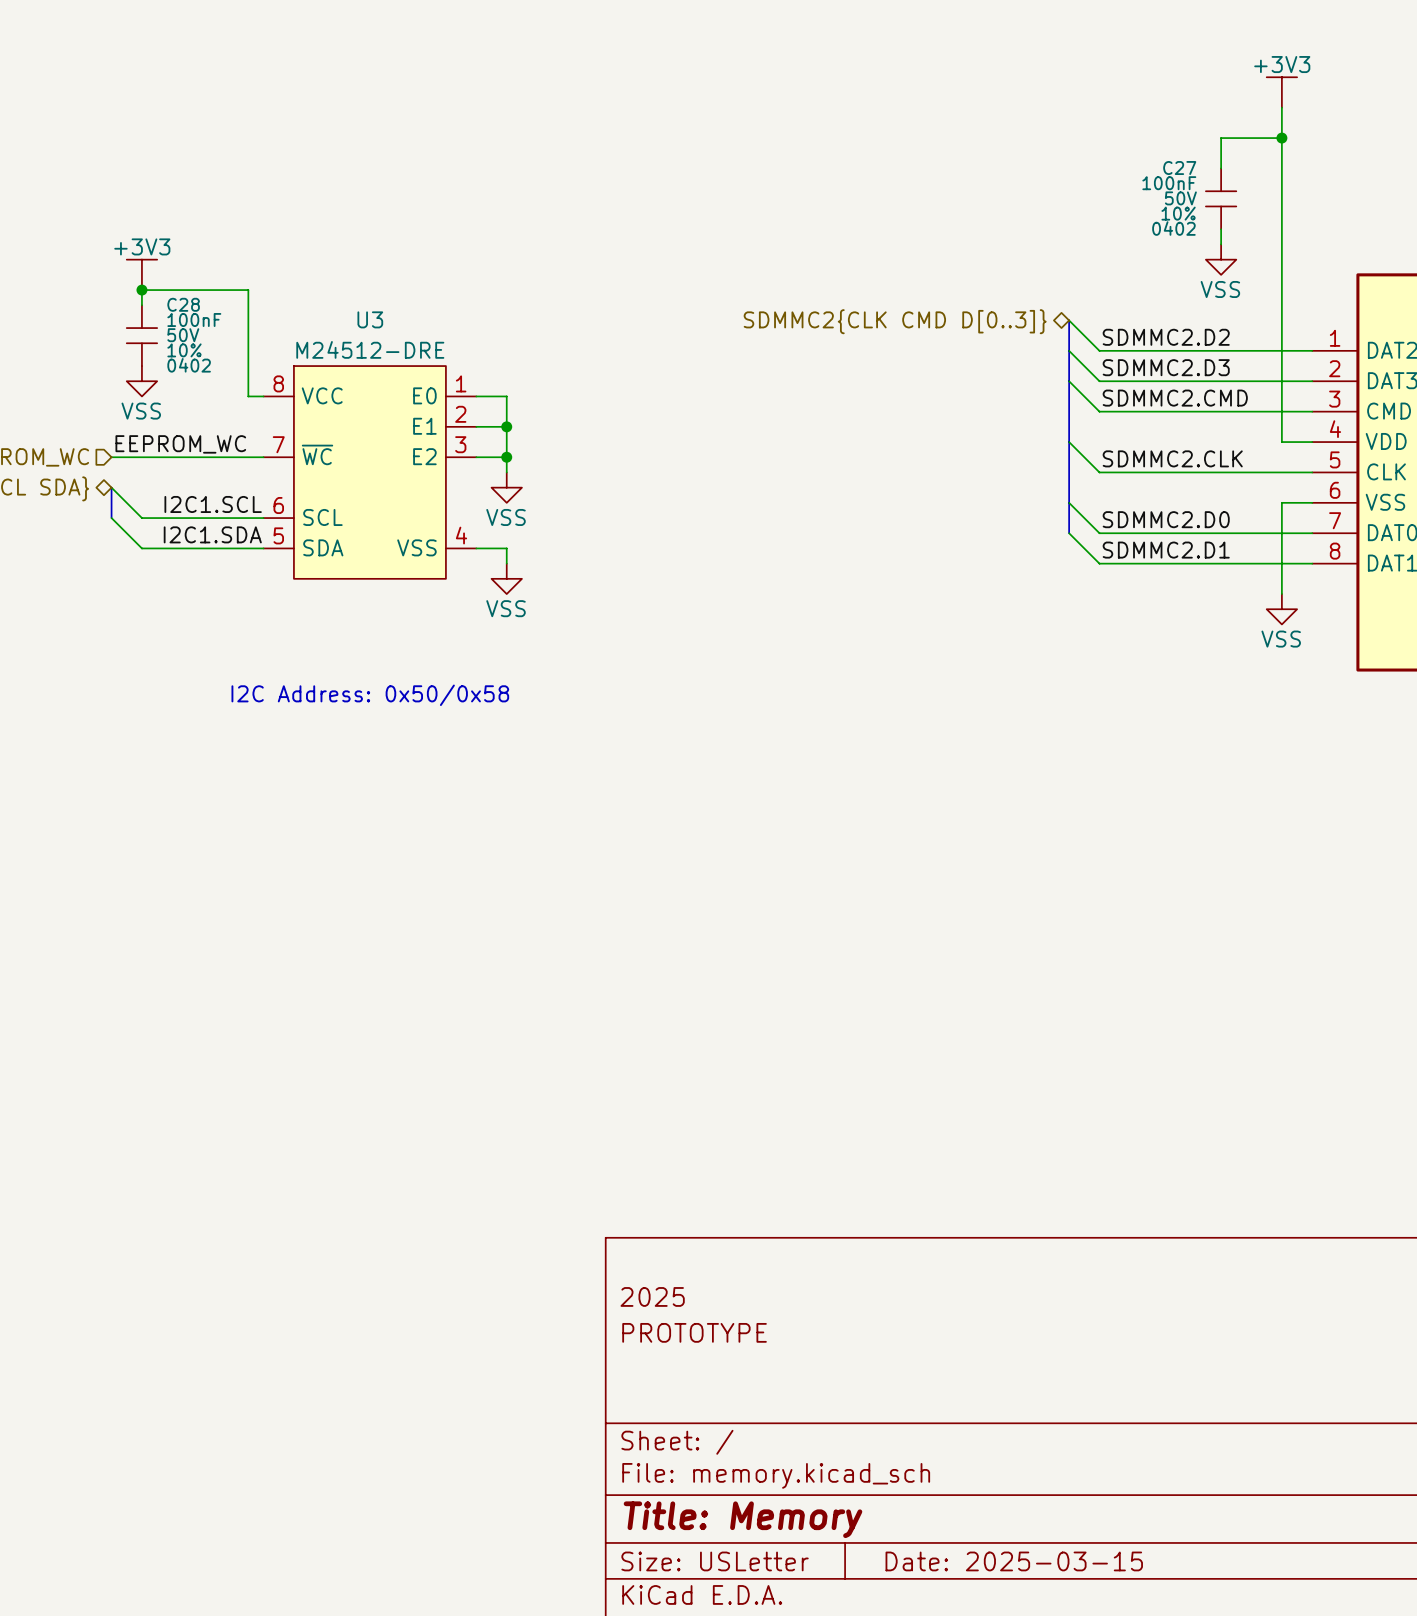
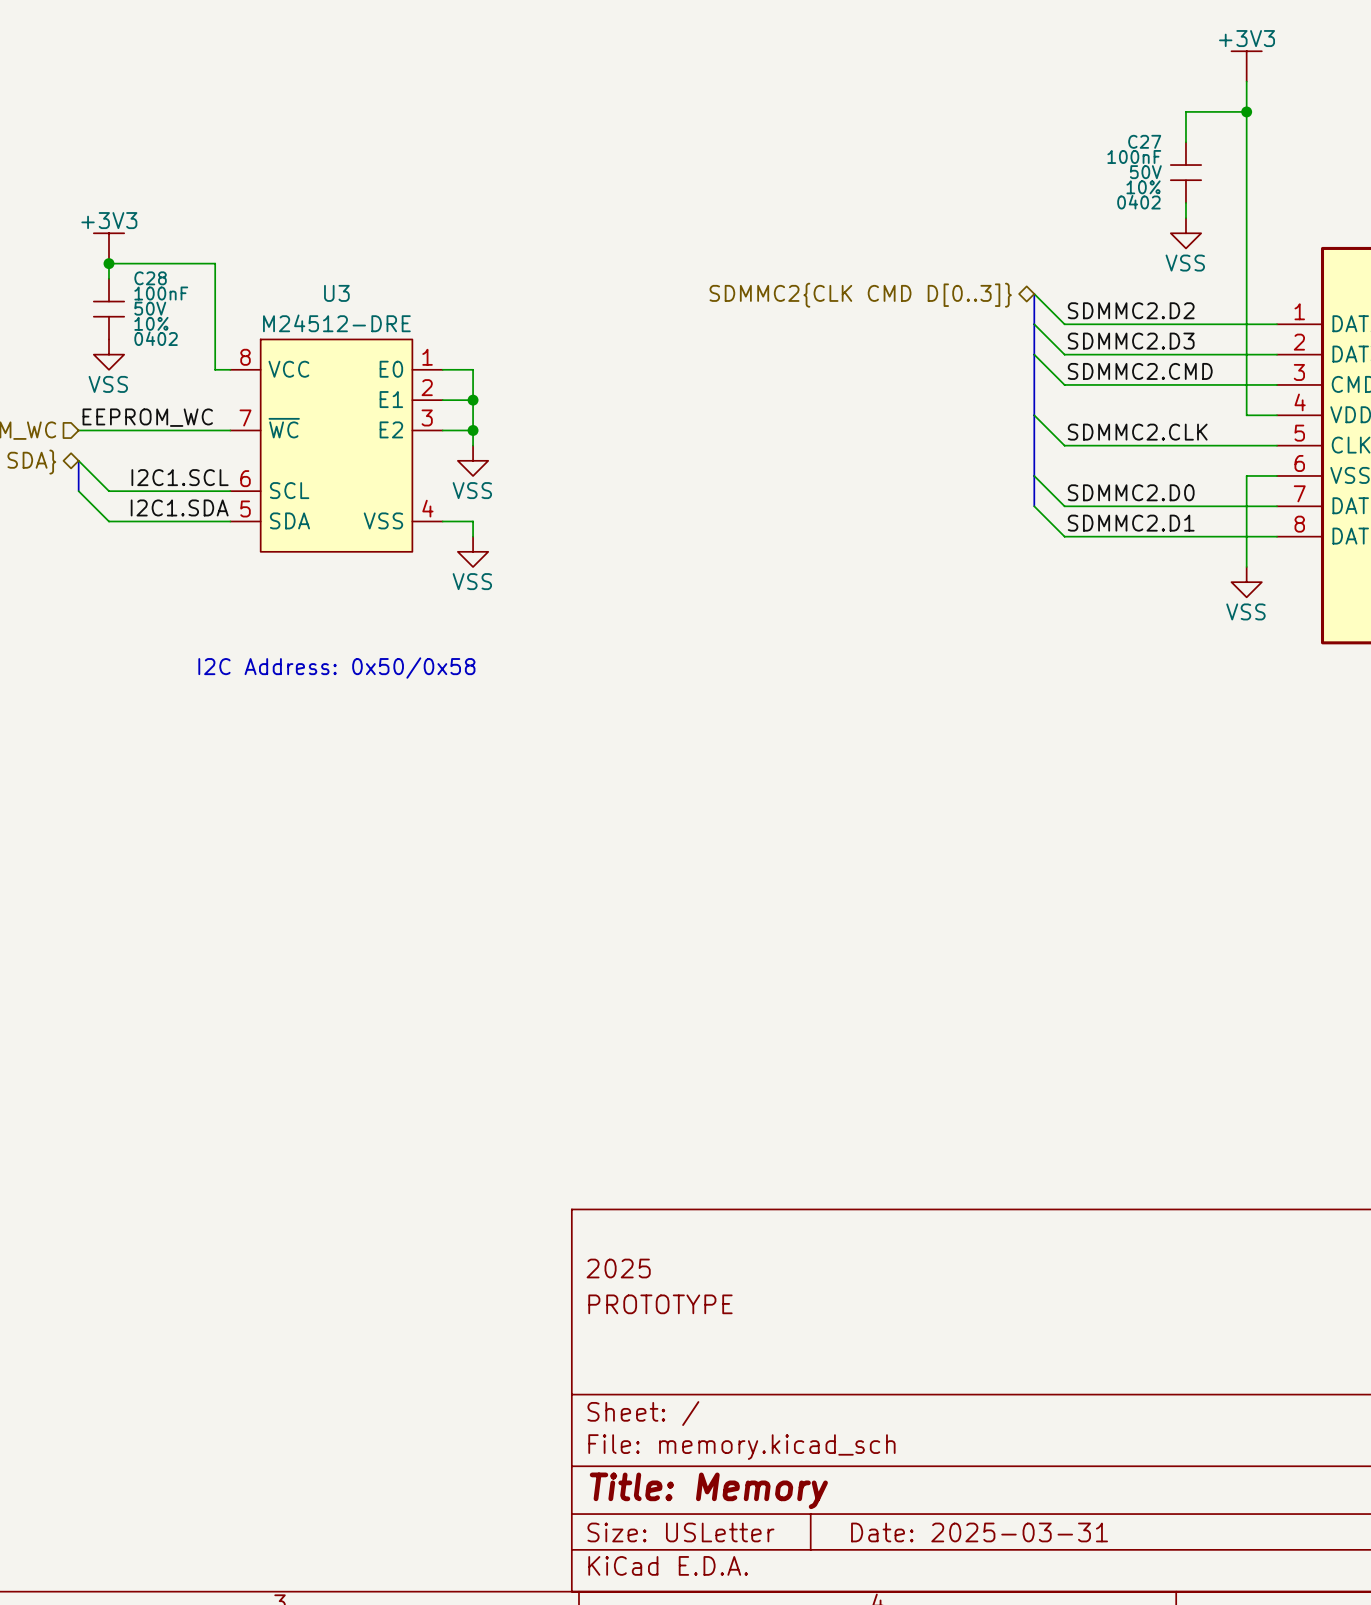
title block: Date: 2025-03-15 (1014, 1561) -> Date: 2025-03-31 (979, 1532)

